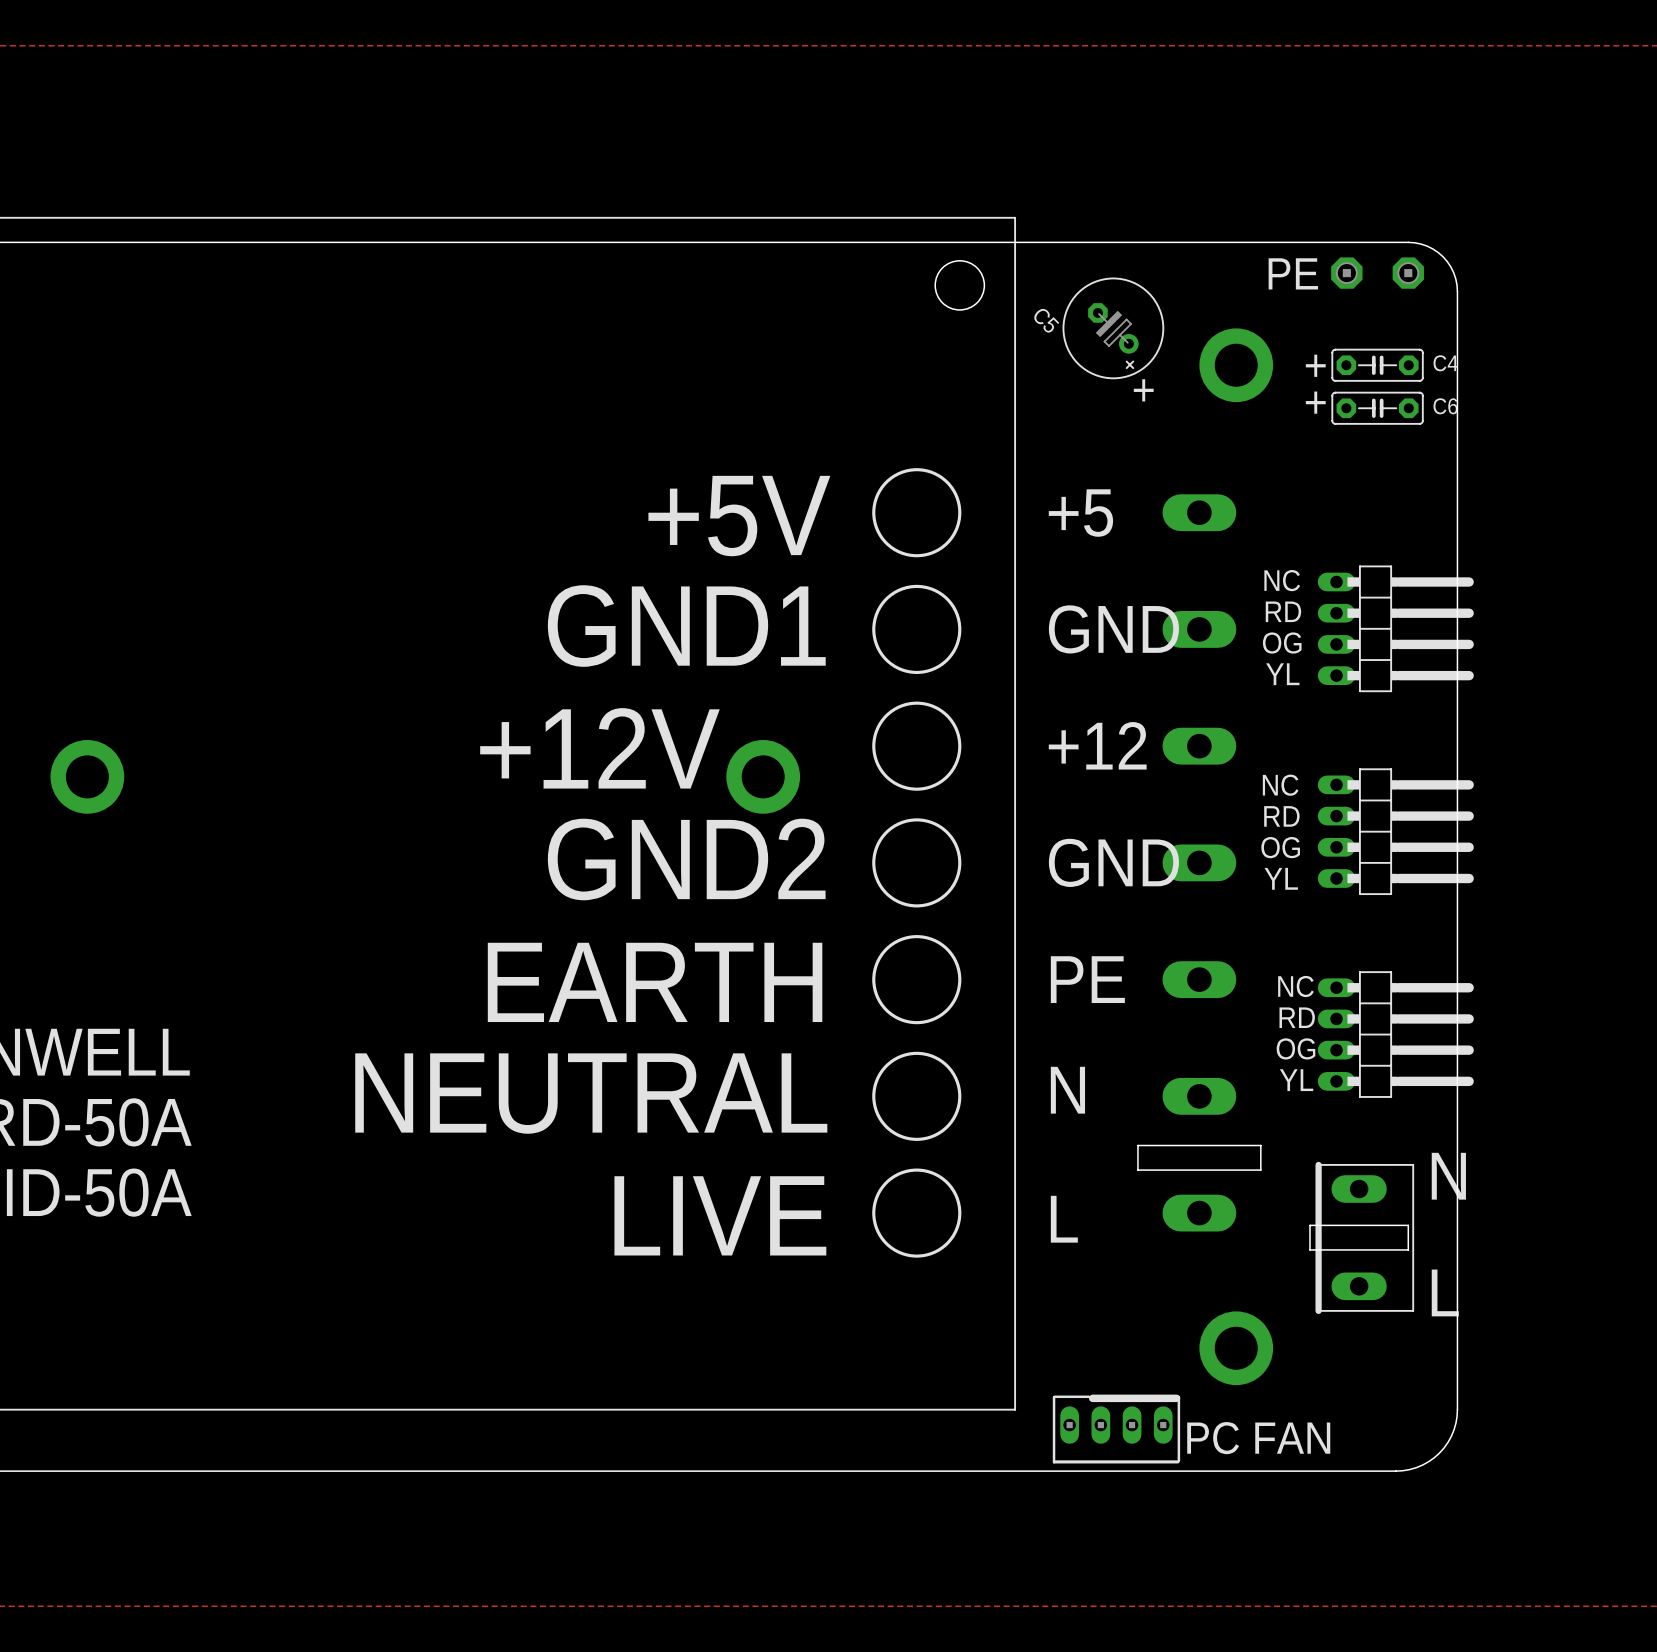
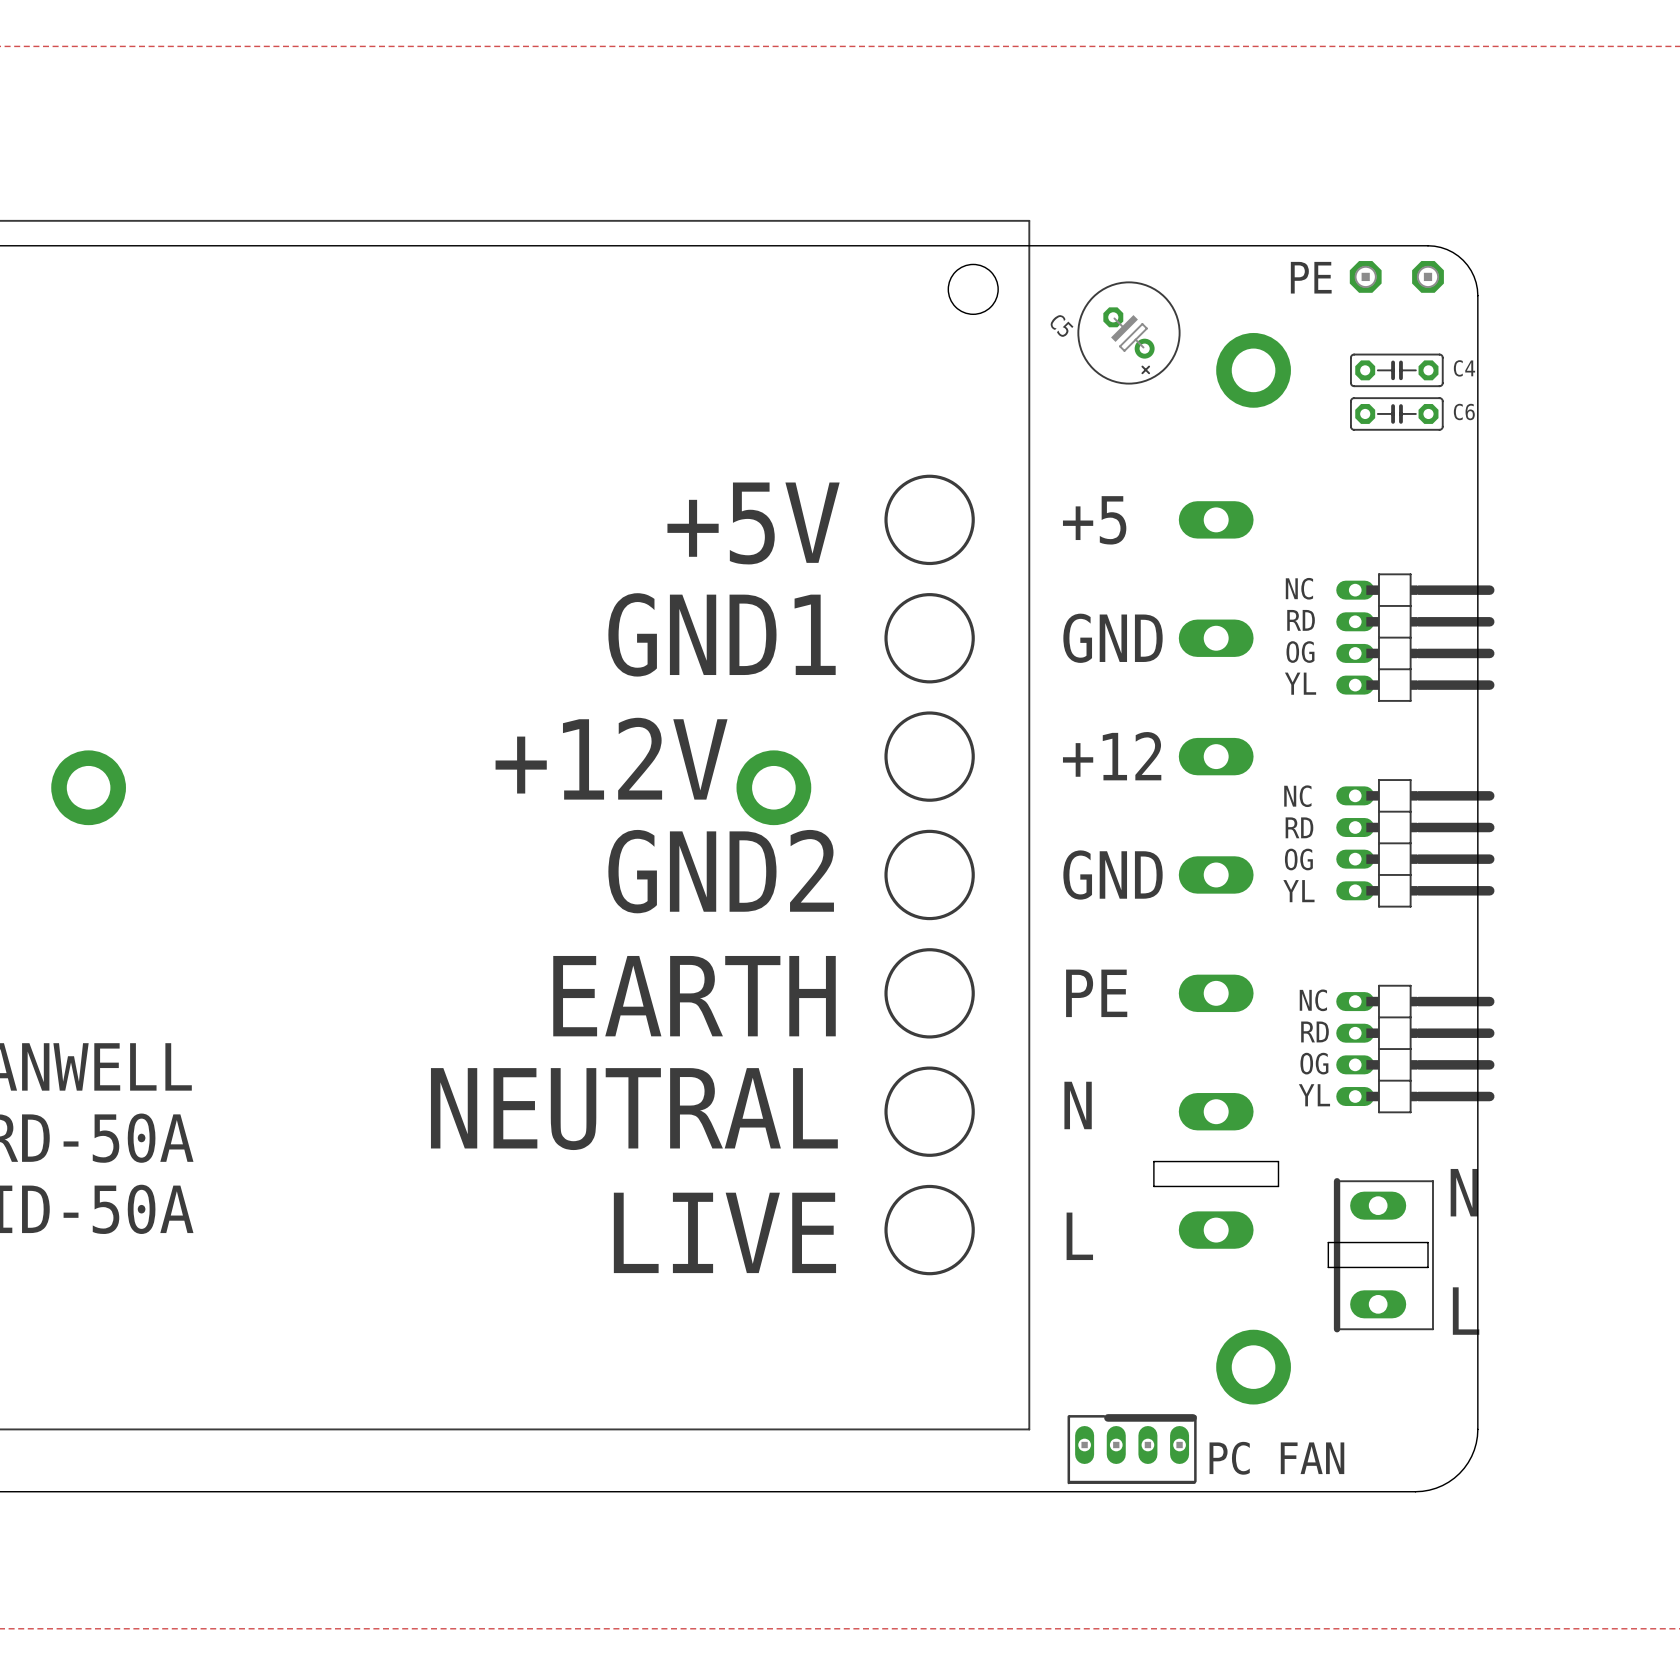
text: + (1315, 365) -> none
text: + (1143, 390) -> none
text: + (1315, 402) -> none

